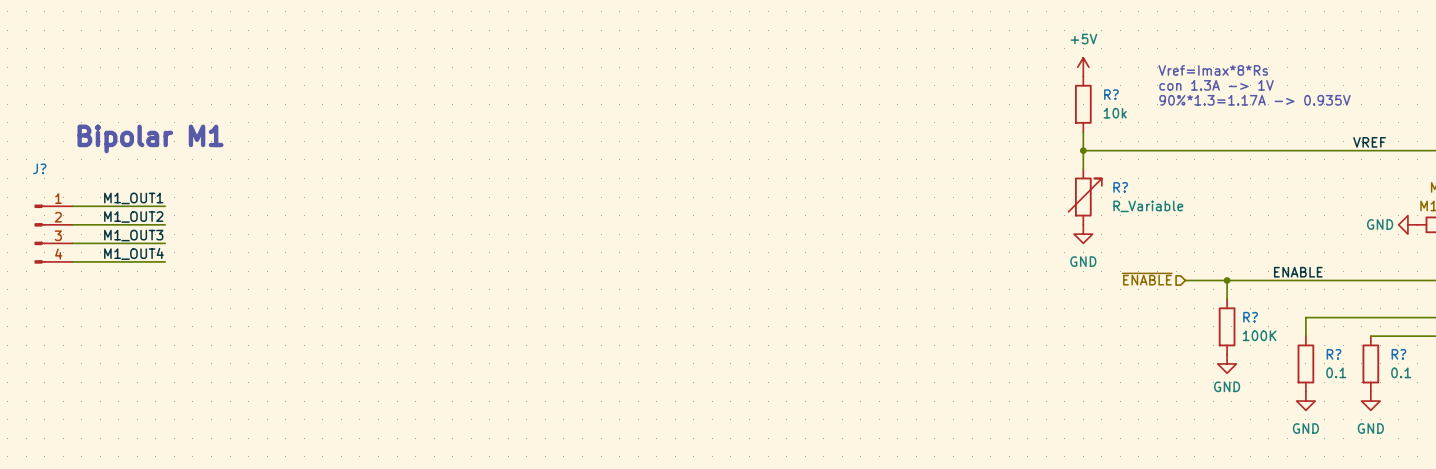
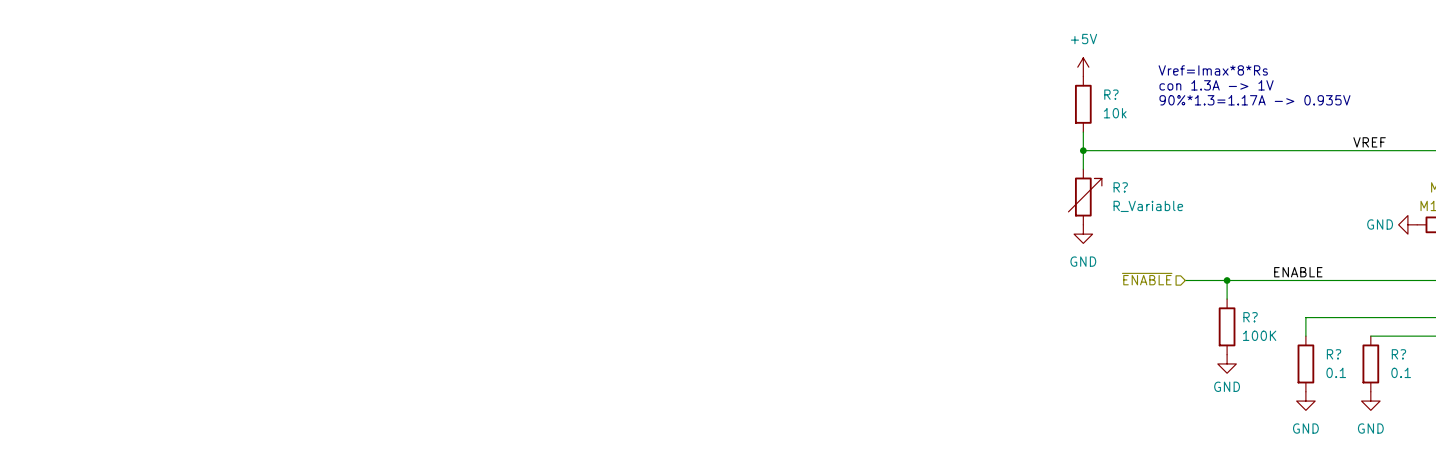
text: Bipolar M1 (150, 138) -> none
label: M1_OUT1 (133, 198) -> none
wire: (72, 206) (165, 206) -> none
label: M1_OUT2 (133, 217) -> none
wire: (72, 224) (165, 224) -> none
J?: (53, 234) -> none
label: M1_OUT3 (133, 235) -> none
wire: (72, 243) (165, 243) -> none
label: M1_OUT4 (133, 253) -> none
wire: (72, 261) (165, 261) -> none

